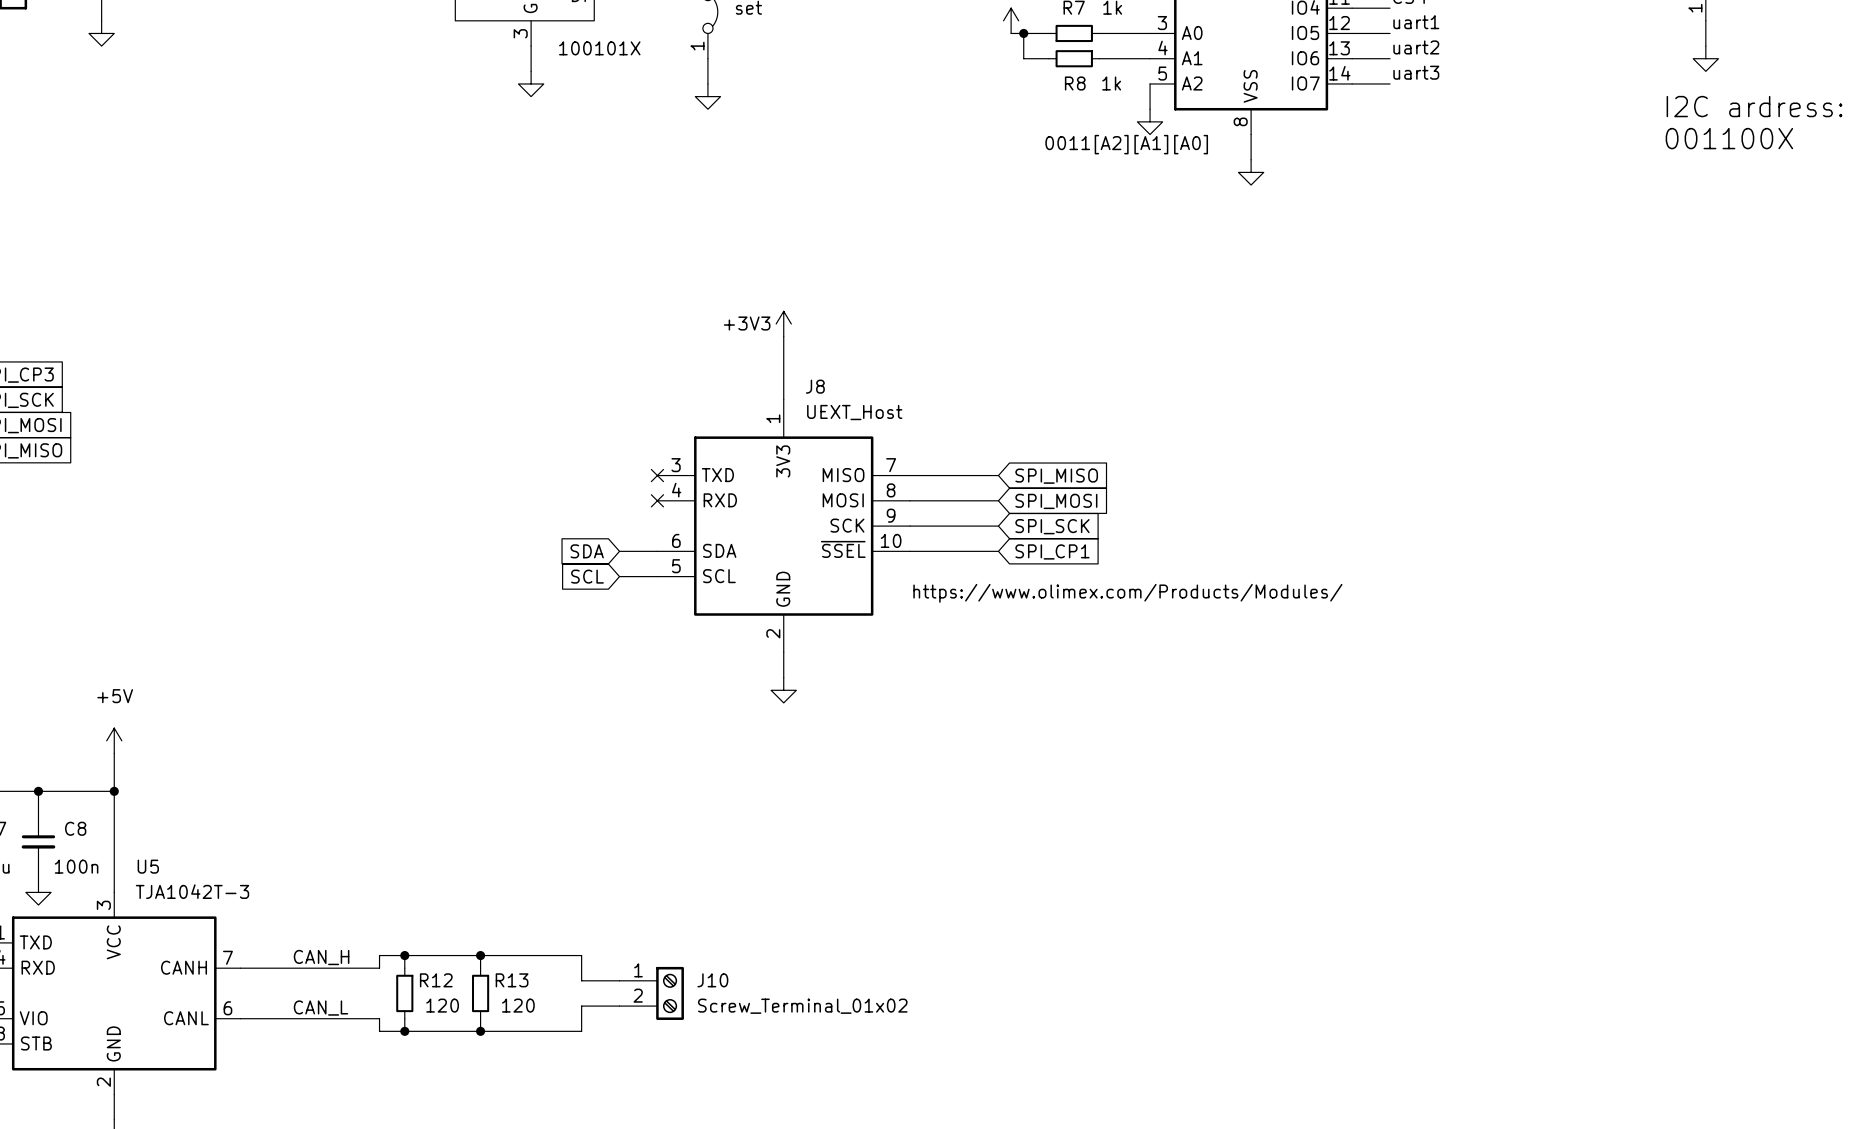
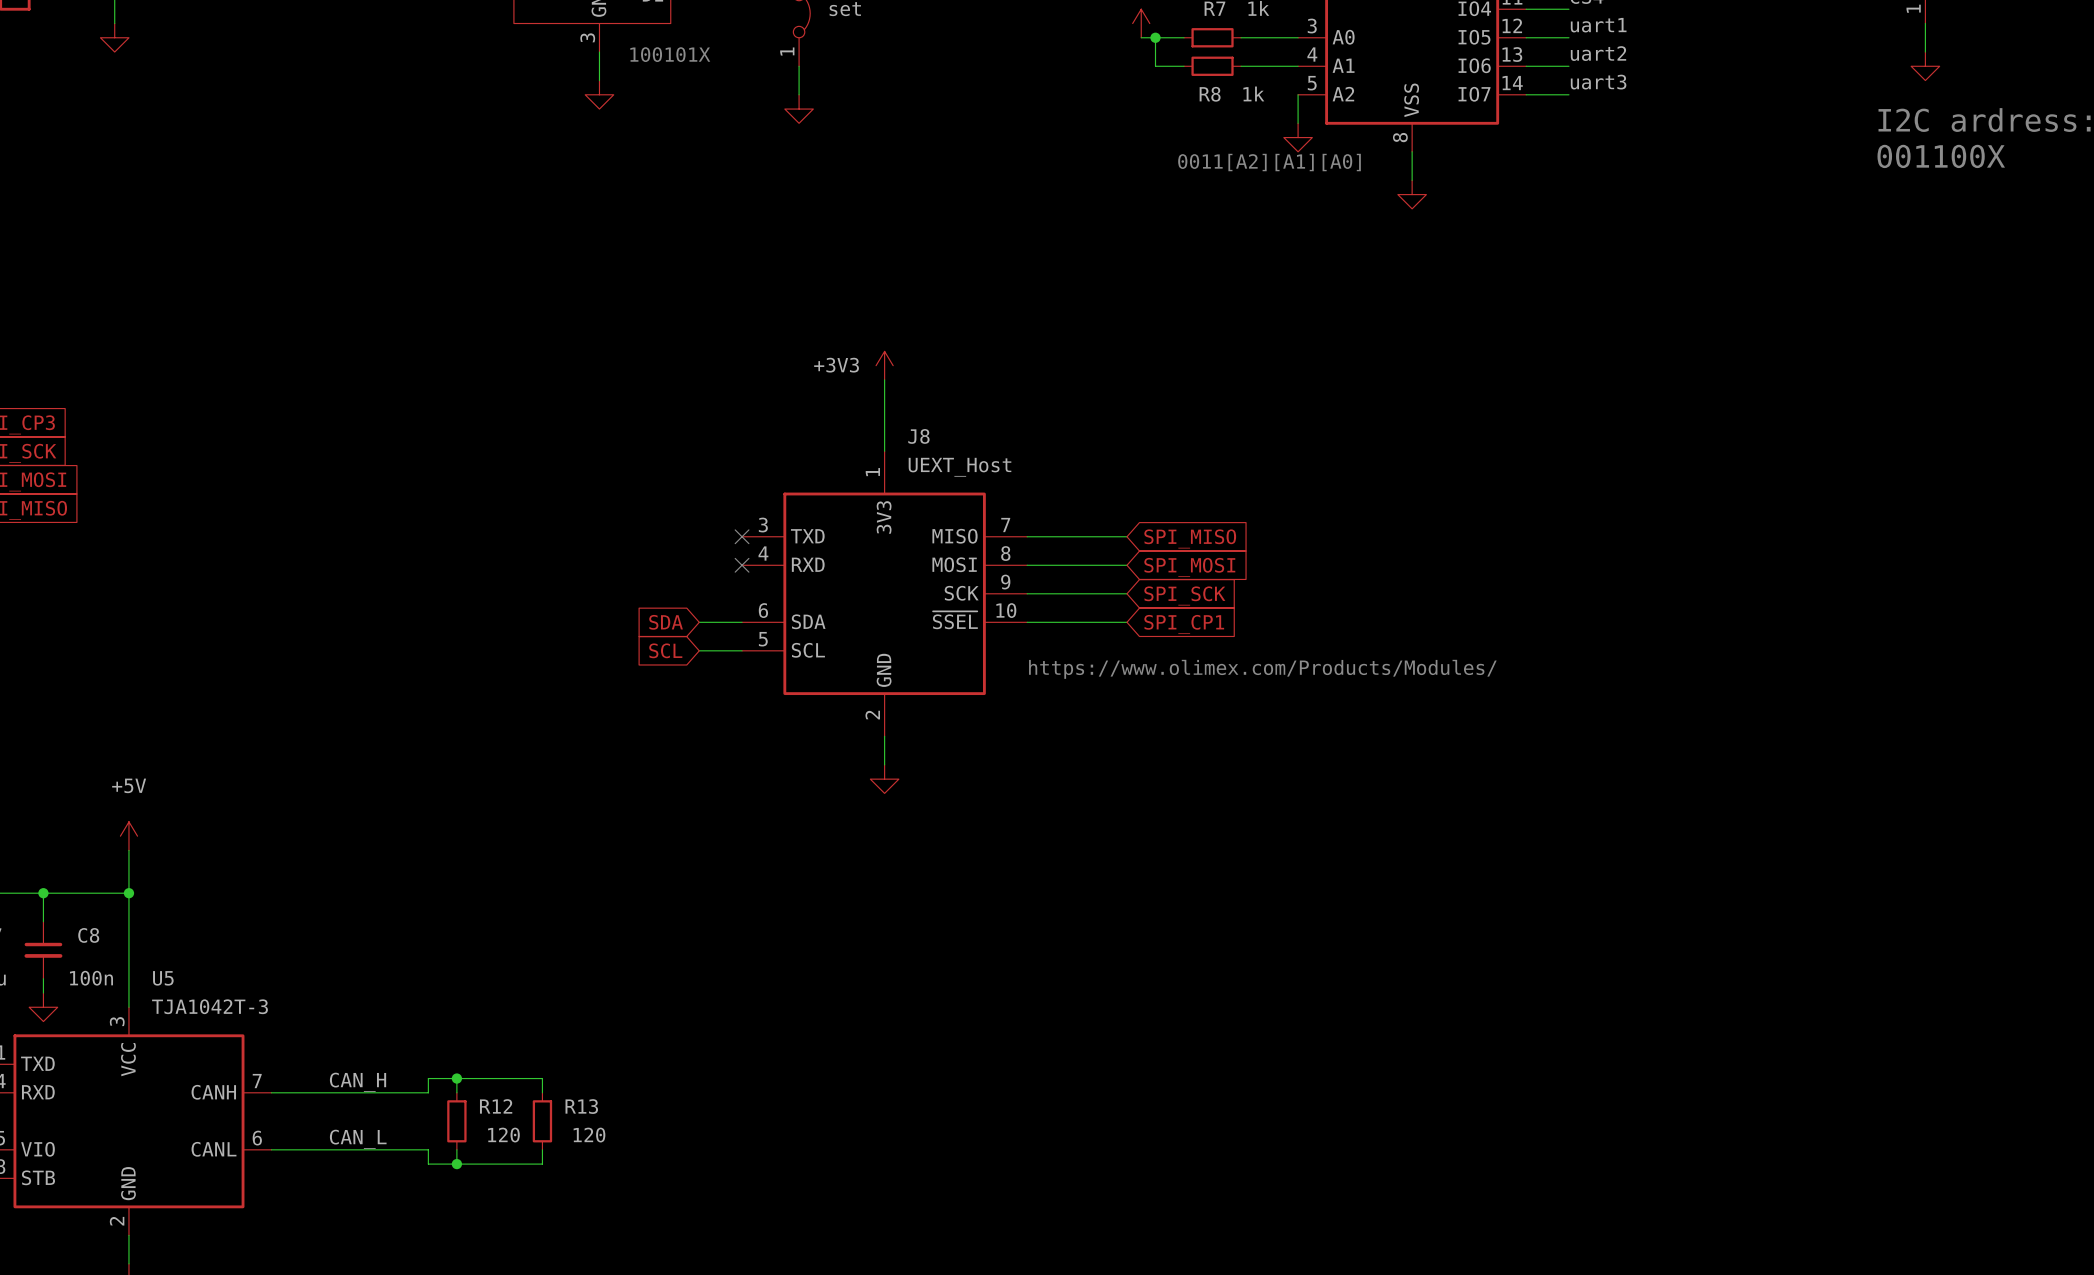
wire: (480, 955) (581, 955) (581, 980) (619, 980) -> none
junction: (480, 955) -> none
J10: Screw_Terminal_01x02 (651, 993) -> none
wire: (619, 1006) (581, 1006) (581, 1031) (480, 1031) -> none
junction: (480, 1031) -> none

